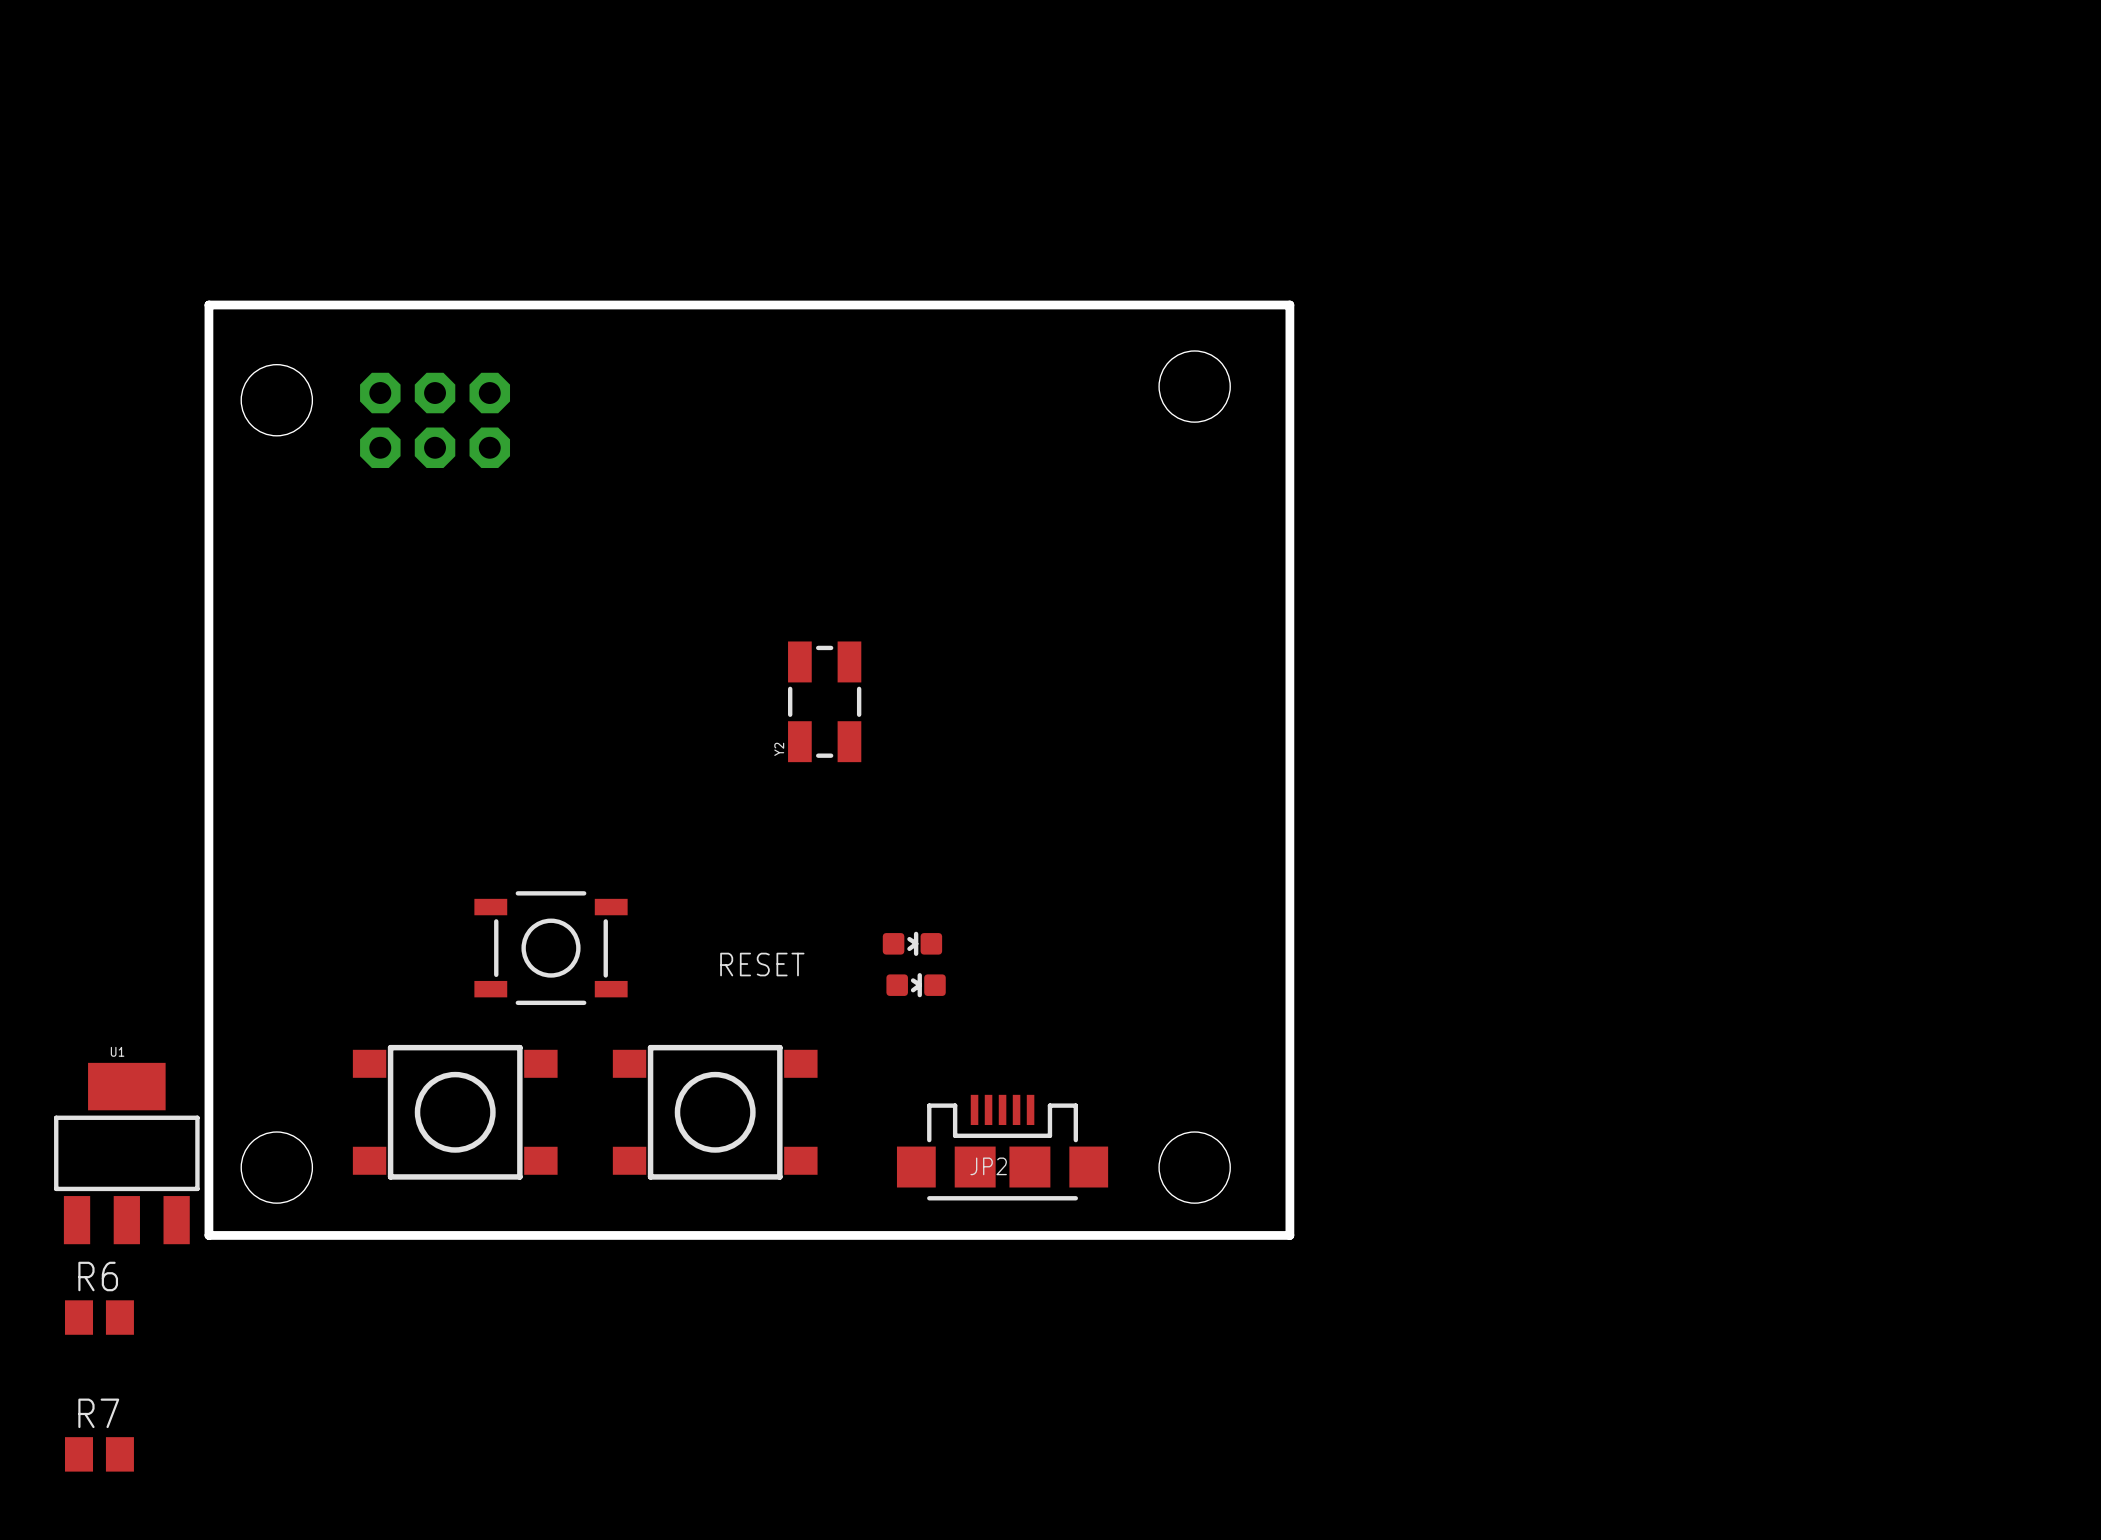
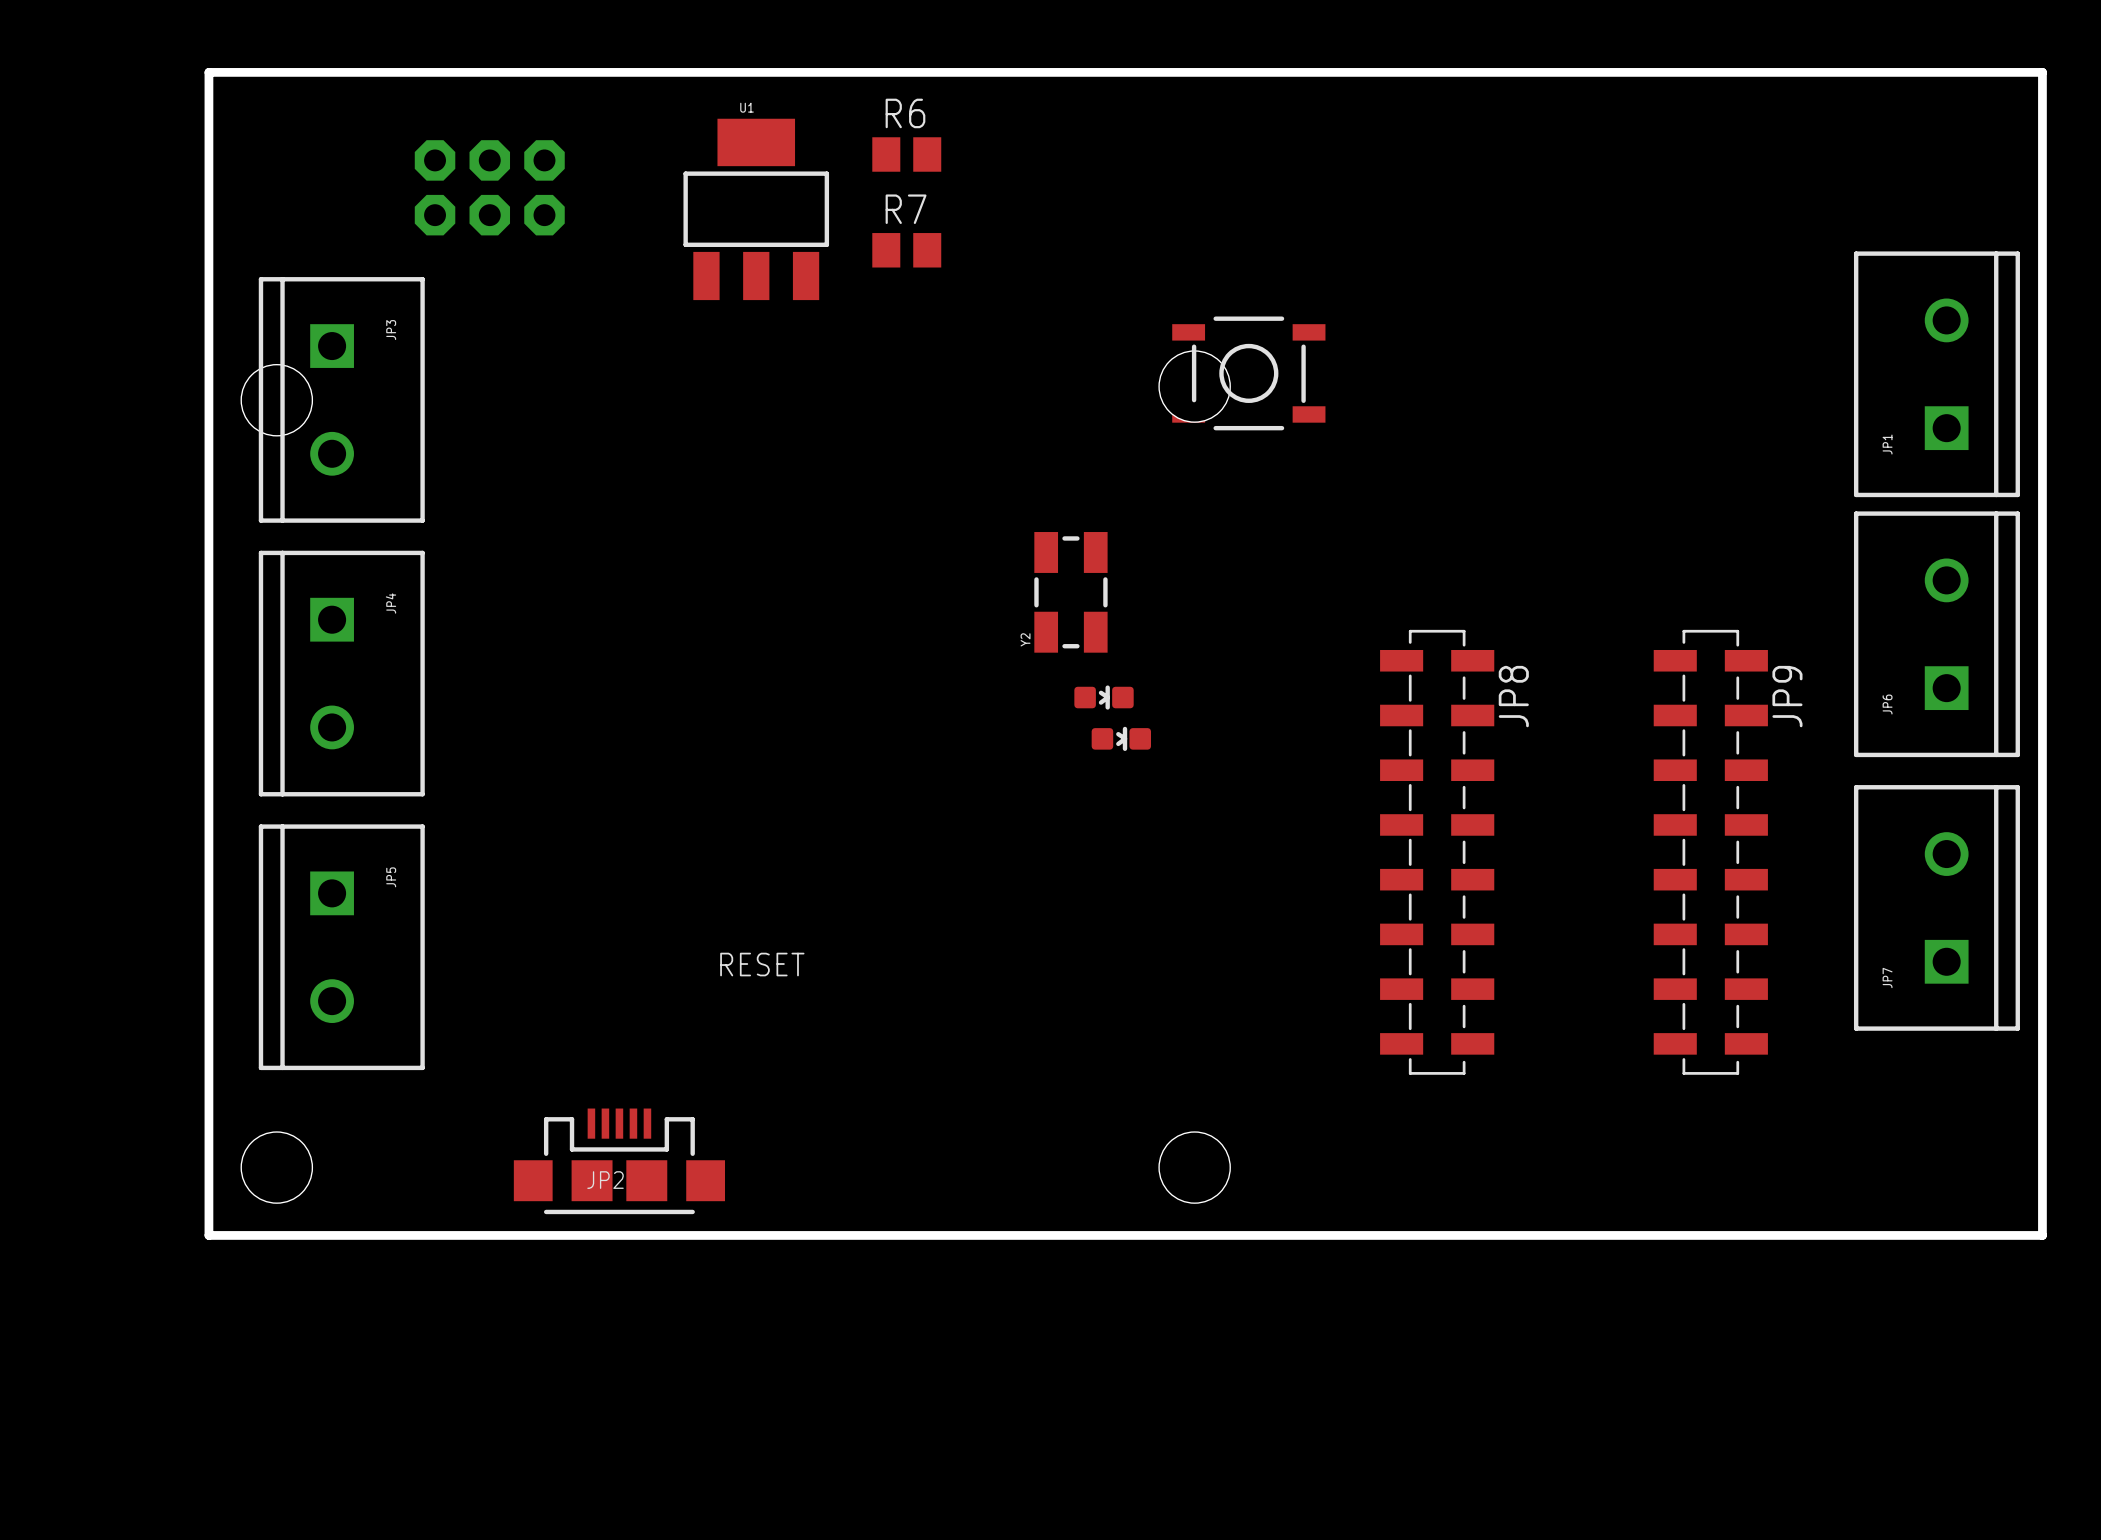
board edge: (208, 305) (1289, 305) (1289, 1235) -> (208, 305) (208, 72) (2042, 72) (2042, 1235) (1289, 1235)
part: none -> (1248, 373)
JP1: none -> (1936, 374)
JP3: none -> (341, 399)
part position: (435, 420) -> (489, 187)
JP6: none -> (1936, 634)
JP4: none -> (341, 673)
part: none -> (1104, 697)
Y2 position: (824, 701) -> (1070, 592)
part: none -> (1121, 738)
JP8: none -> (1437, 852)
JP9: none -> (1710, 852)
JP7: none -> (1936, 907)
part: (912, 943) -> none
JP5: none -> (341, 947)
part: (551, 948) -> none
part: (916, 985) -> none
part: (455, 1112) -> none
part: (715, 1112) -> none
JP2 position: (1002, 1147) -> (619, 1161)
U1 position: (126, 1153) -> (756, 209)
R6 position: (99, 1317) -> (906, 154)
R7 position: (99, 1454) -> (906, 250)

